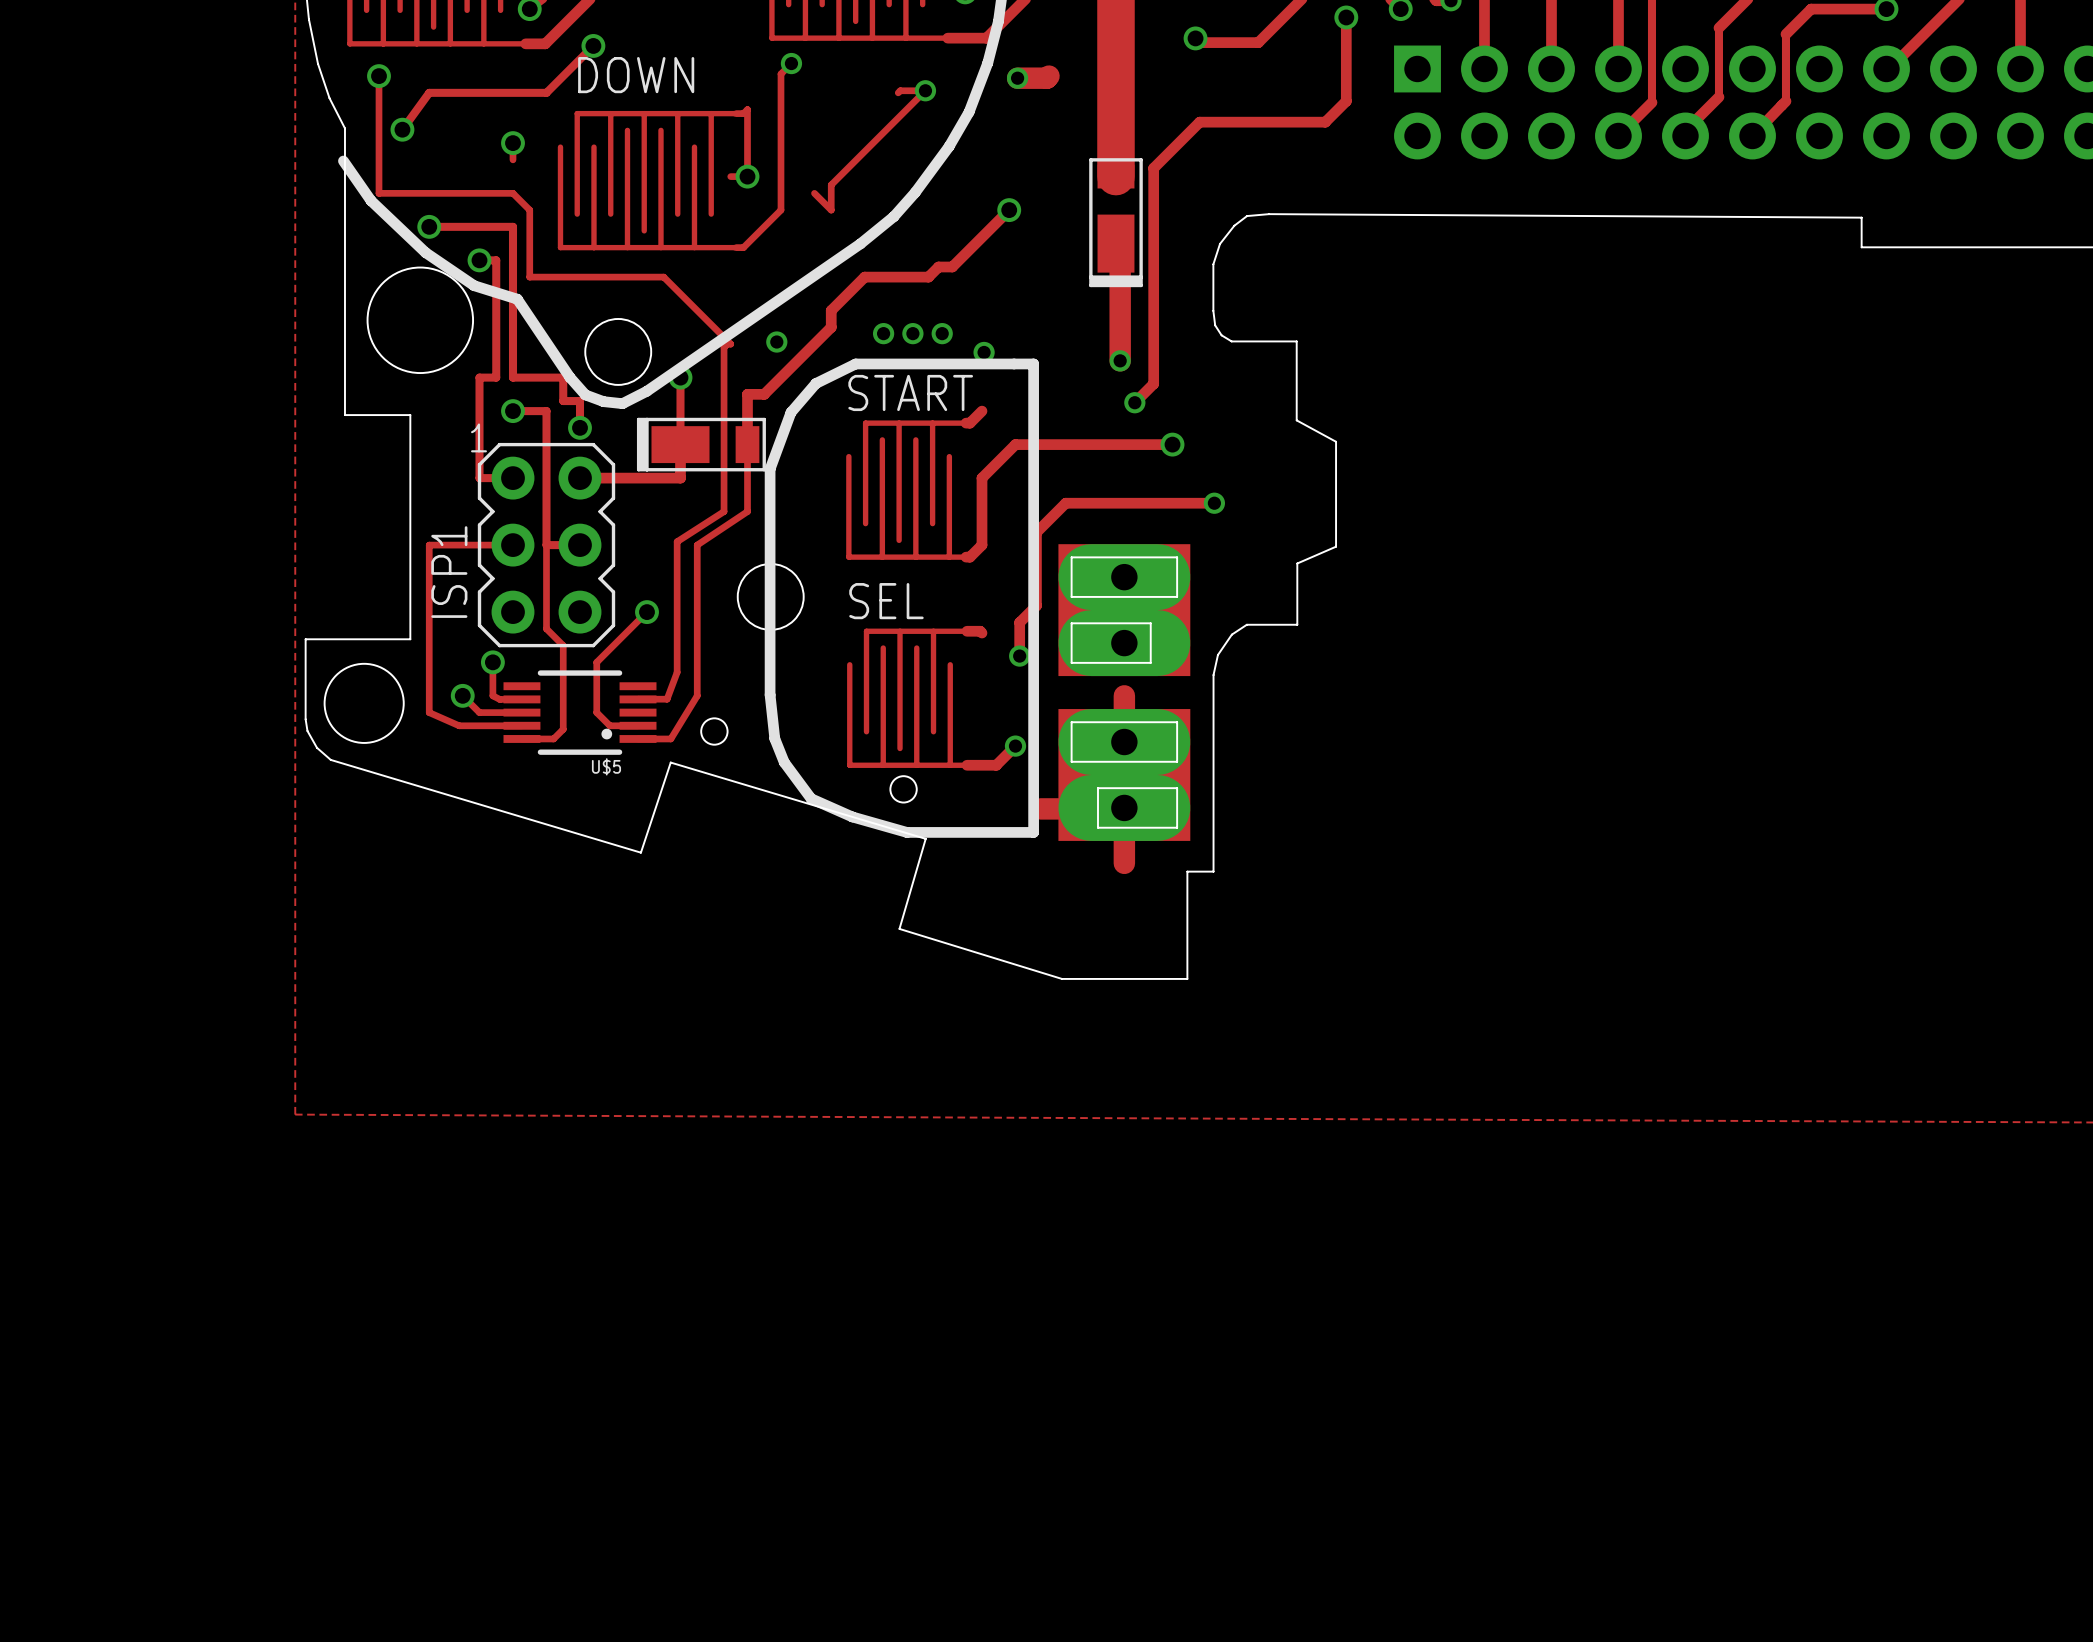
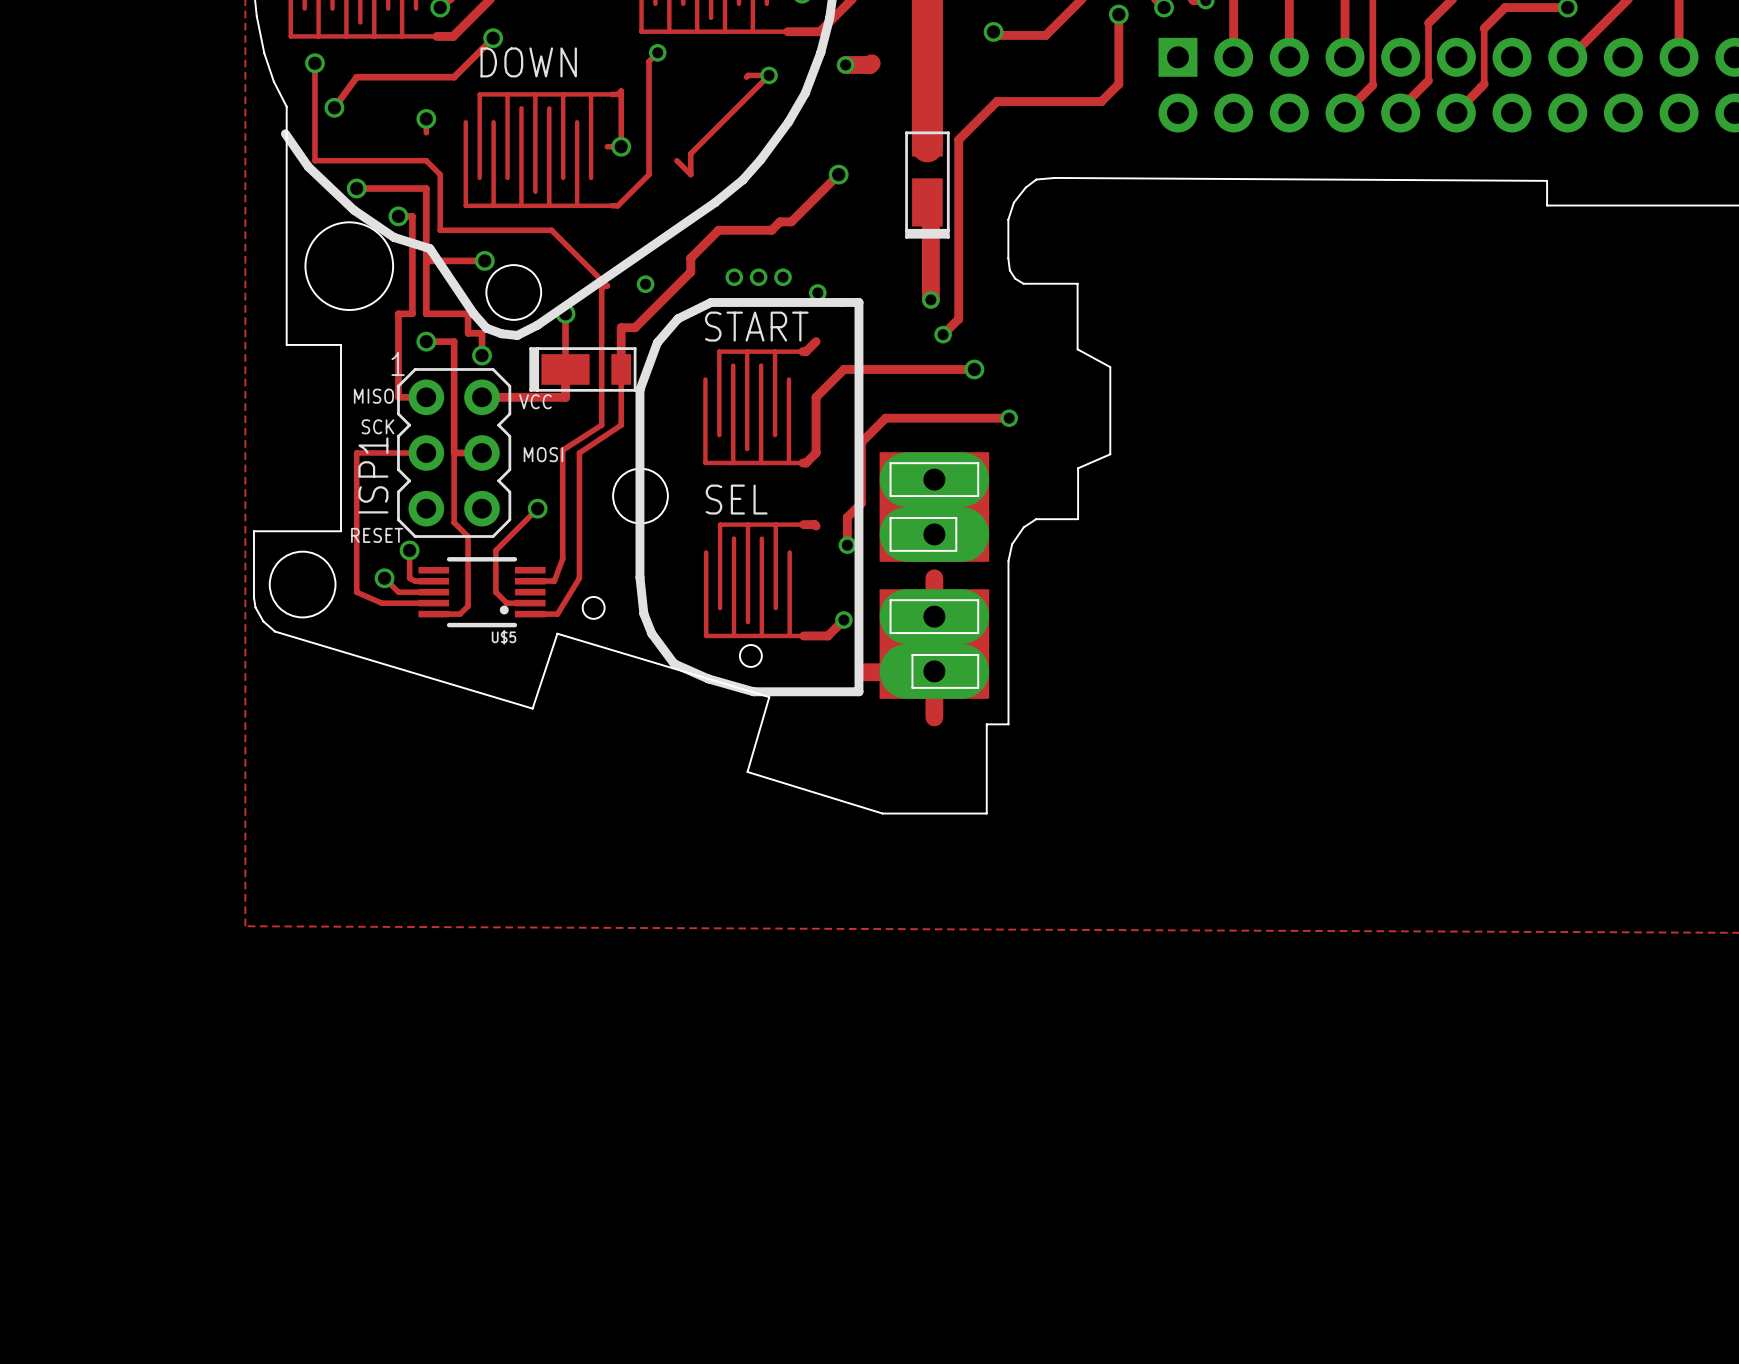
track: none -> (426, 260) (484, 260)
via: none -> (484, 260)
text: none -> MISO (373, 396)
text: none -> VCC (535, 401)
text: none -> SCK (377, 426)
text: none -> MOSI (543, 454)
text: none -> RESET (377, 535)

